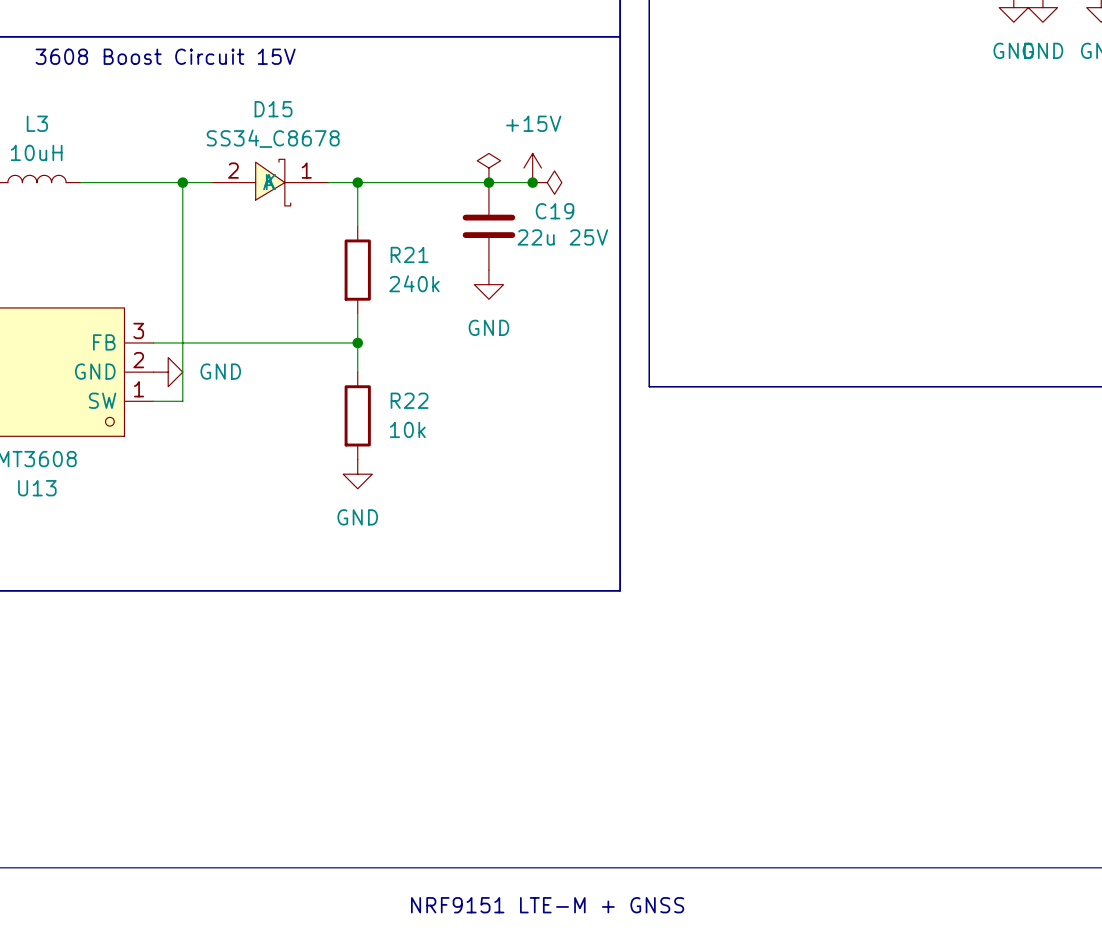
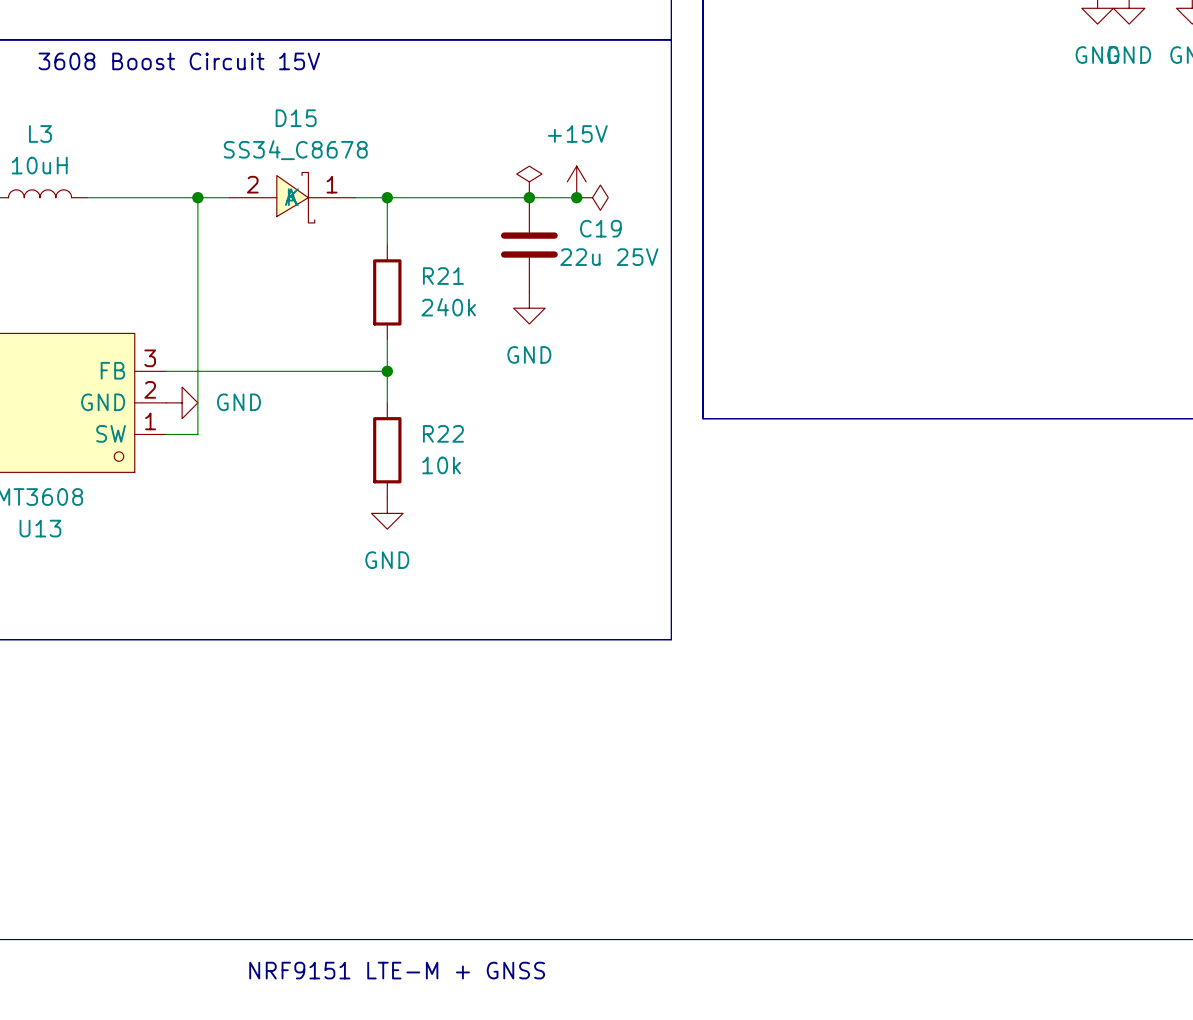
text position: NRF9151 LTE-M + GNSS (547, 905) -> NRF9151 LTE-M + GNSS (397, 970)

